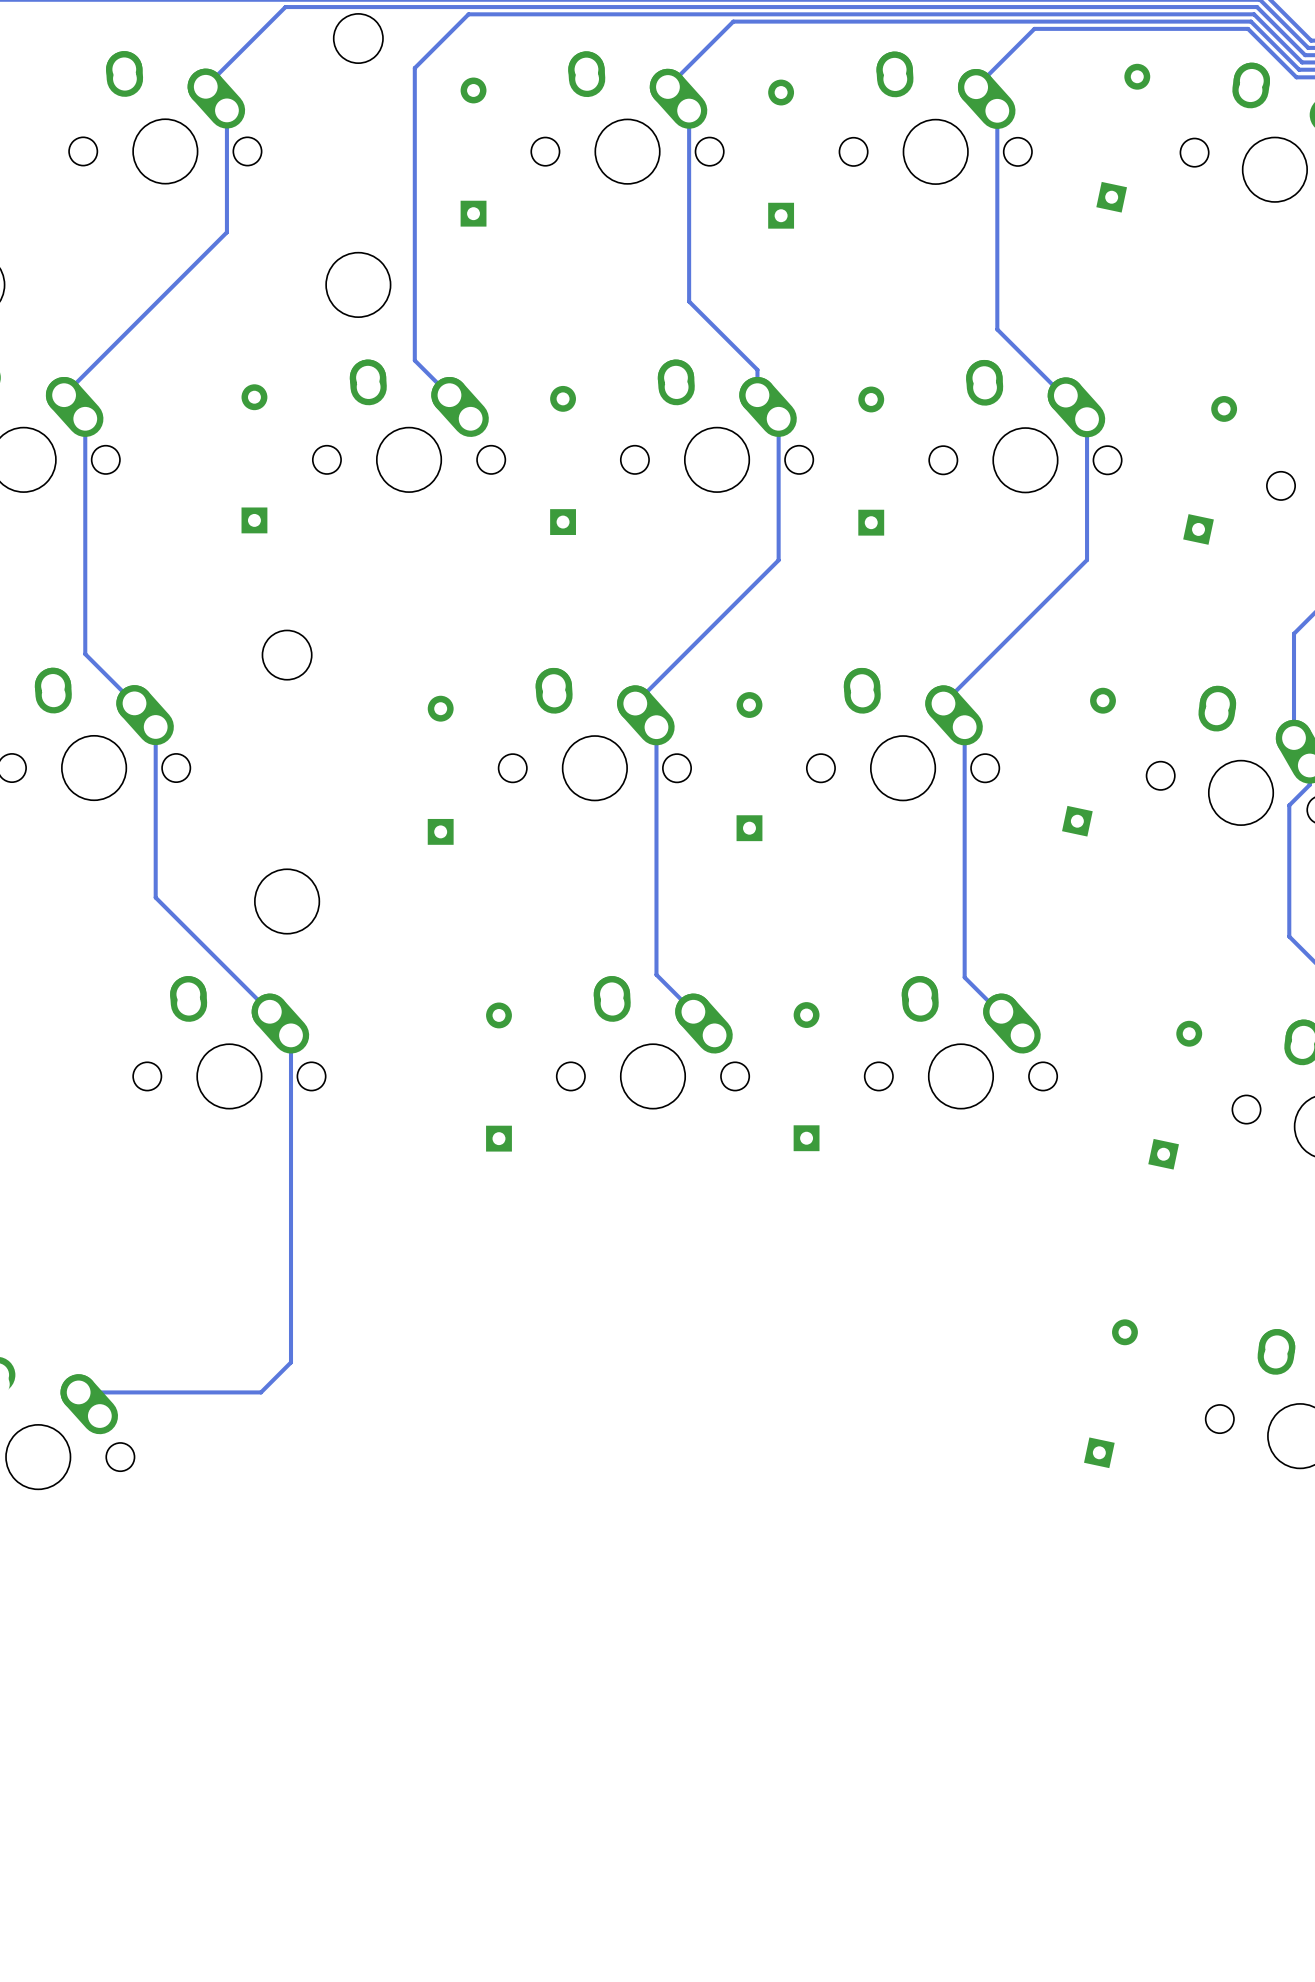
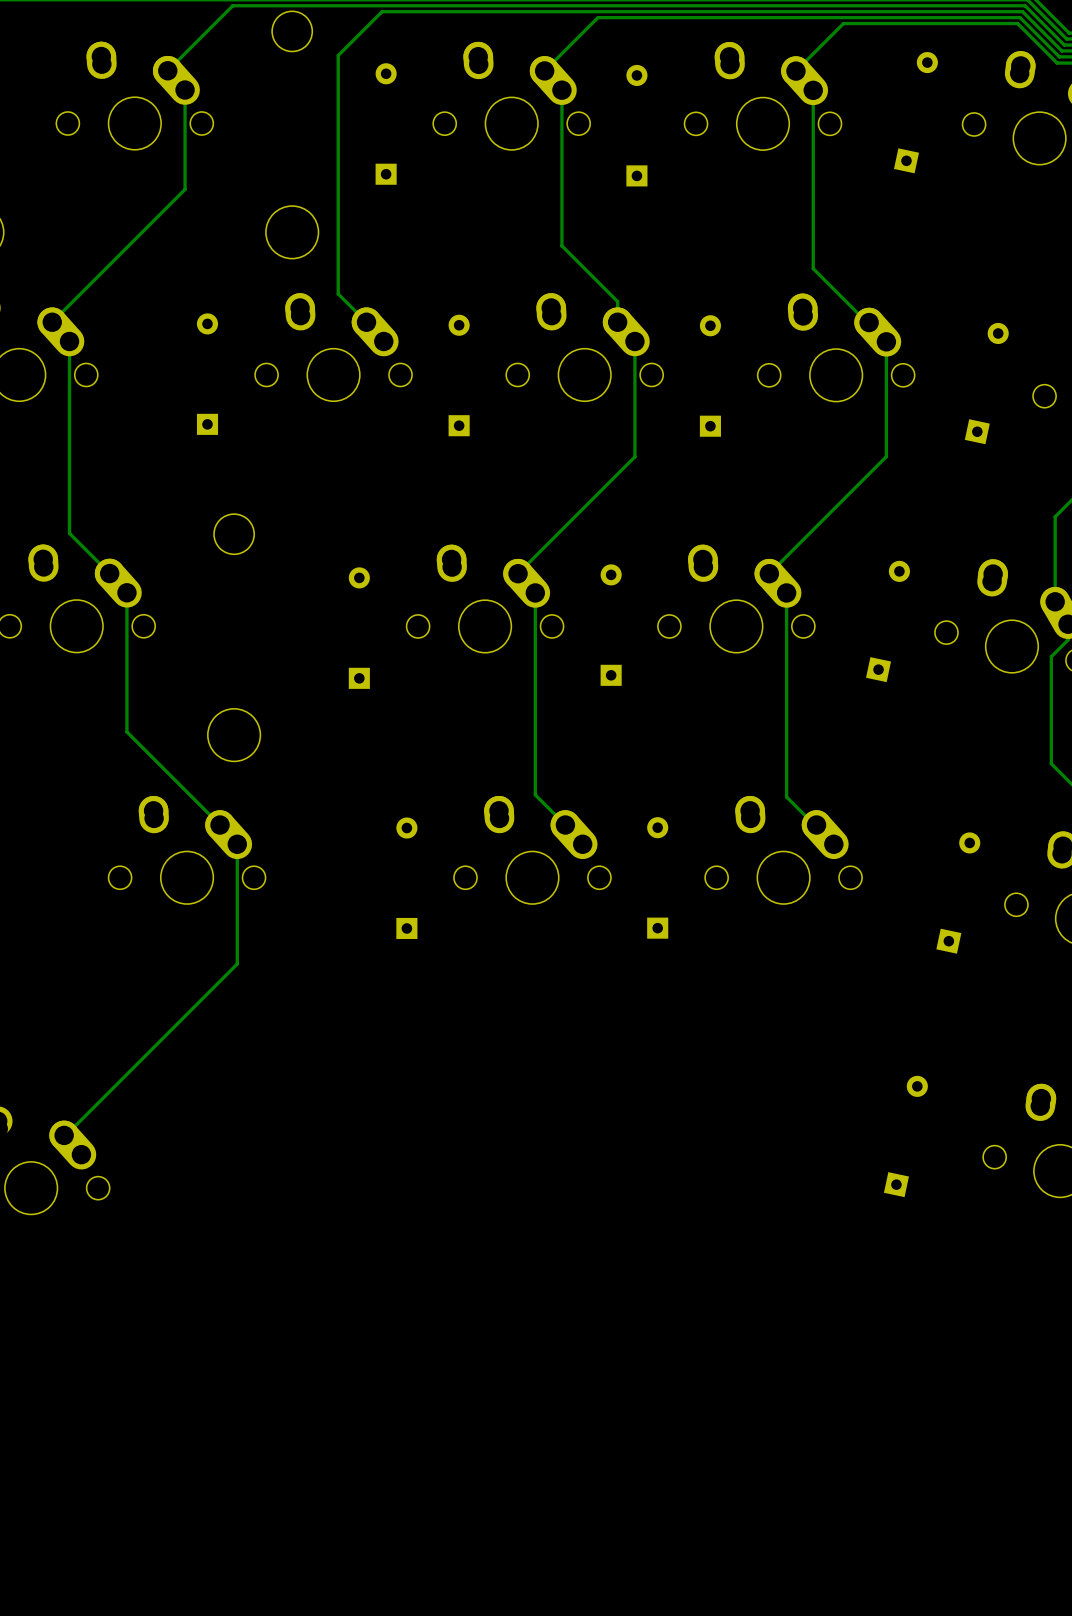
track: (291, 1182) (291, 1362) (261, 1392) (78, 1392) -> (237, 963) (65, 1135)

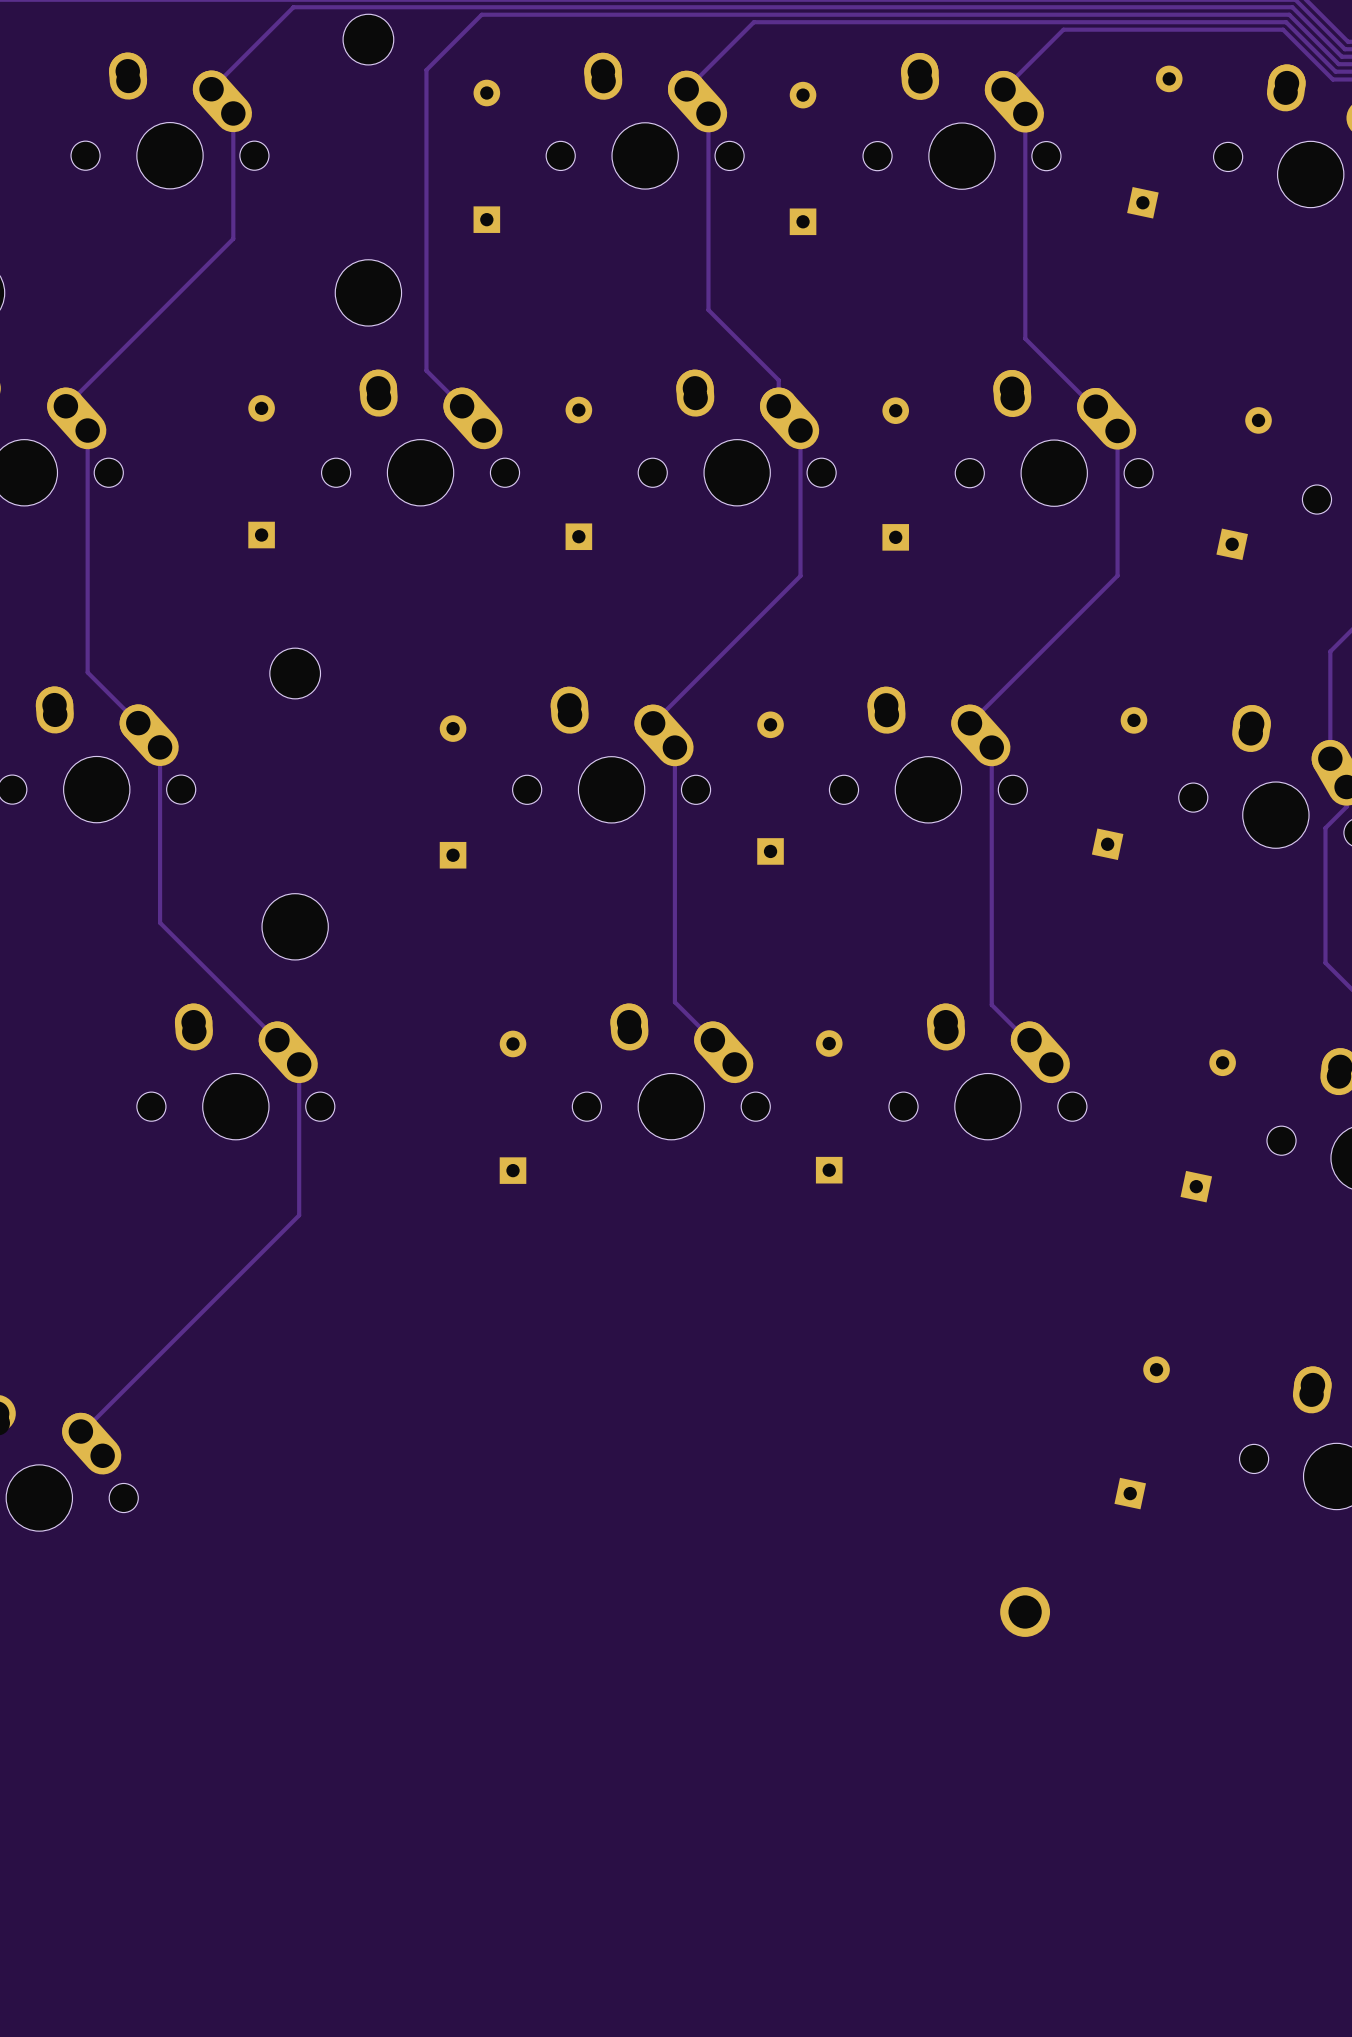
part: none -> (1025, 1612)

